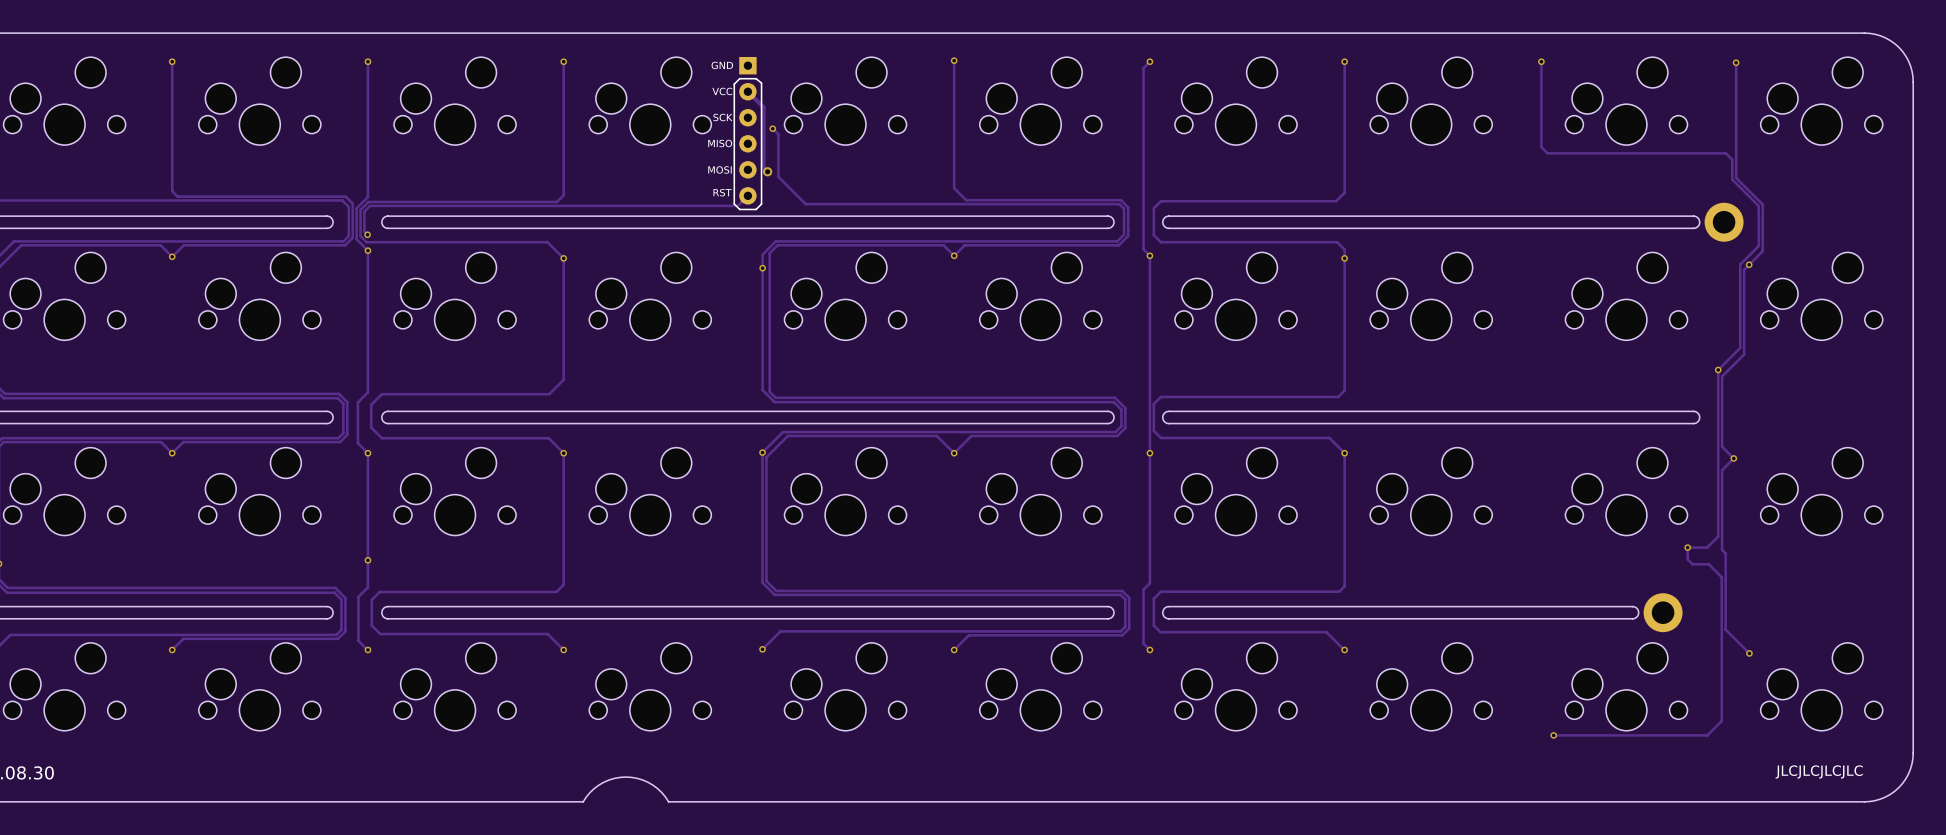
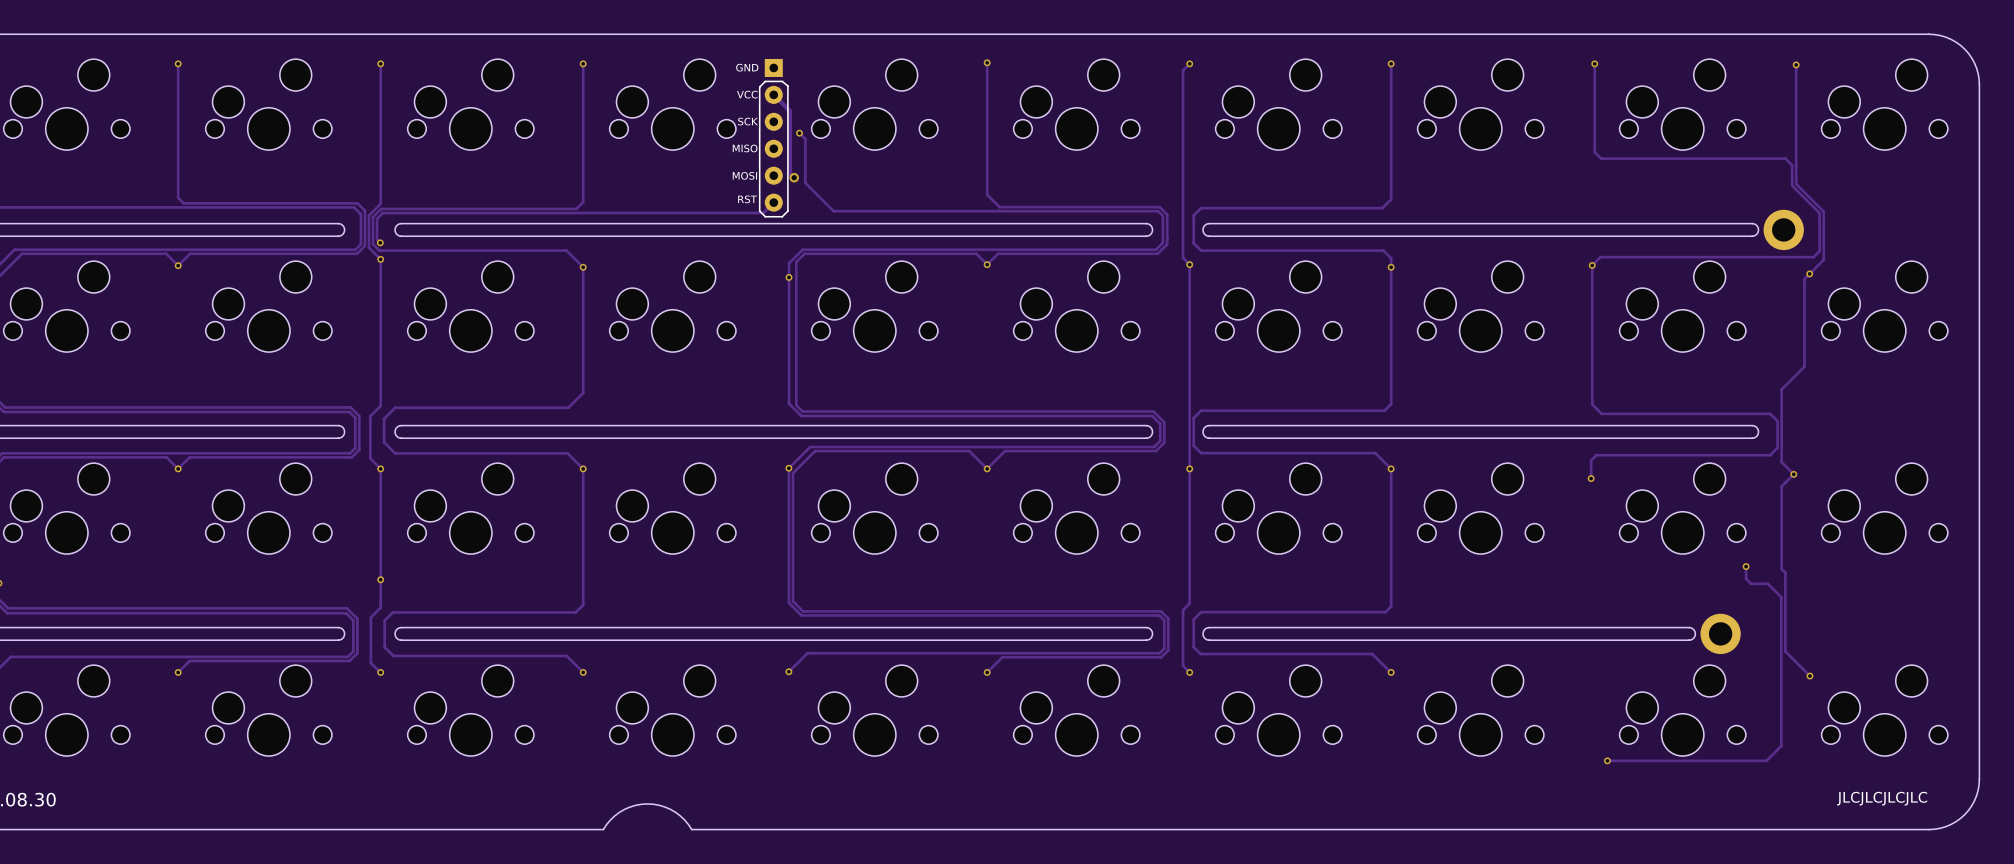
track: (1758, 242) (1758, 245) (1740, 264) (1740, 347) (1718, 369) (1718, 407) -> (1819, 251) (1813, 257) (1600, 257) (1592, 265) (1592, 404) (1601, 413) (1770, 413) (1777, 421)
via: none -> (1592, 265)
via: (1718, 369) -> none
track: (1718, 432) (1718, 536) (1707, 547) (1687, 547) -> (1777, 447) (1770, 455) (1596, 455) (1591, 460) (1591, 478)
via: none -> (1591, 478)

